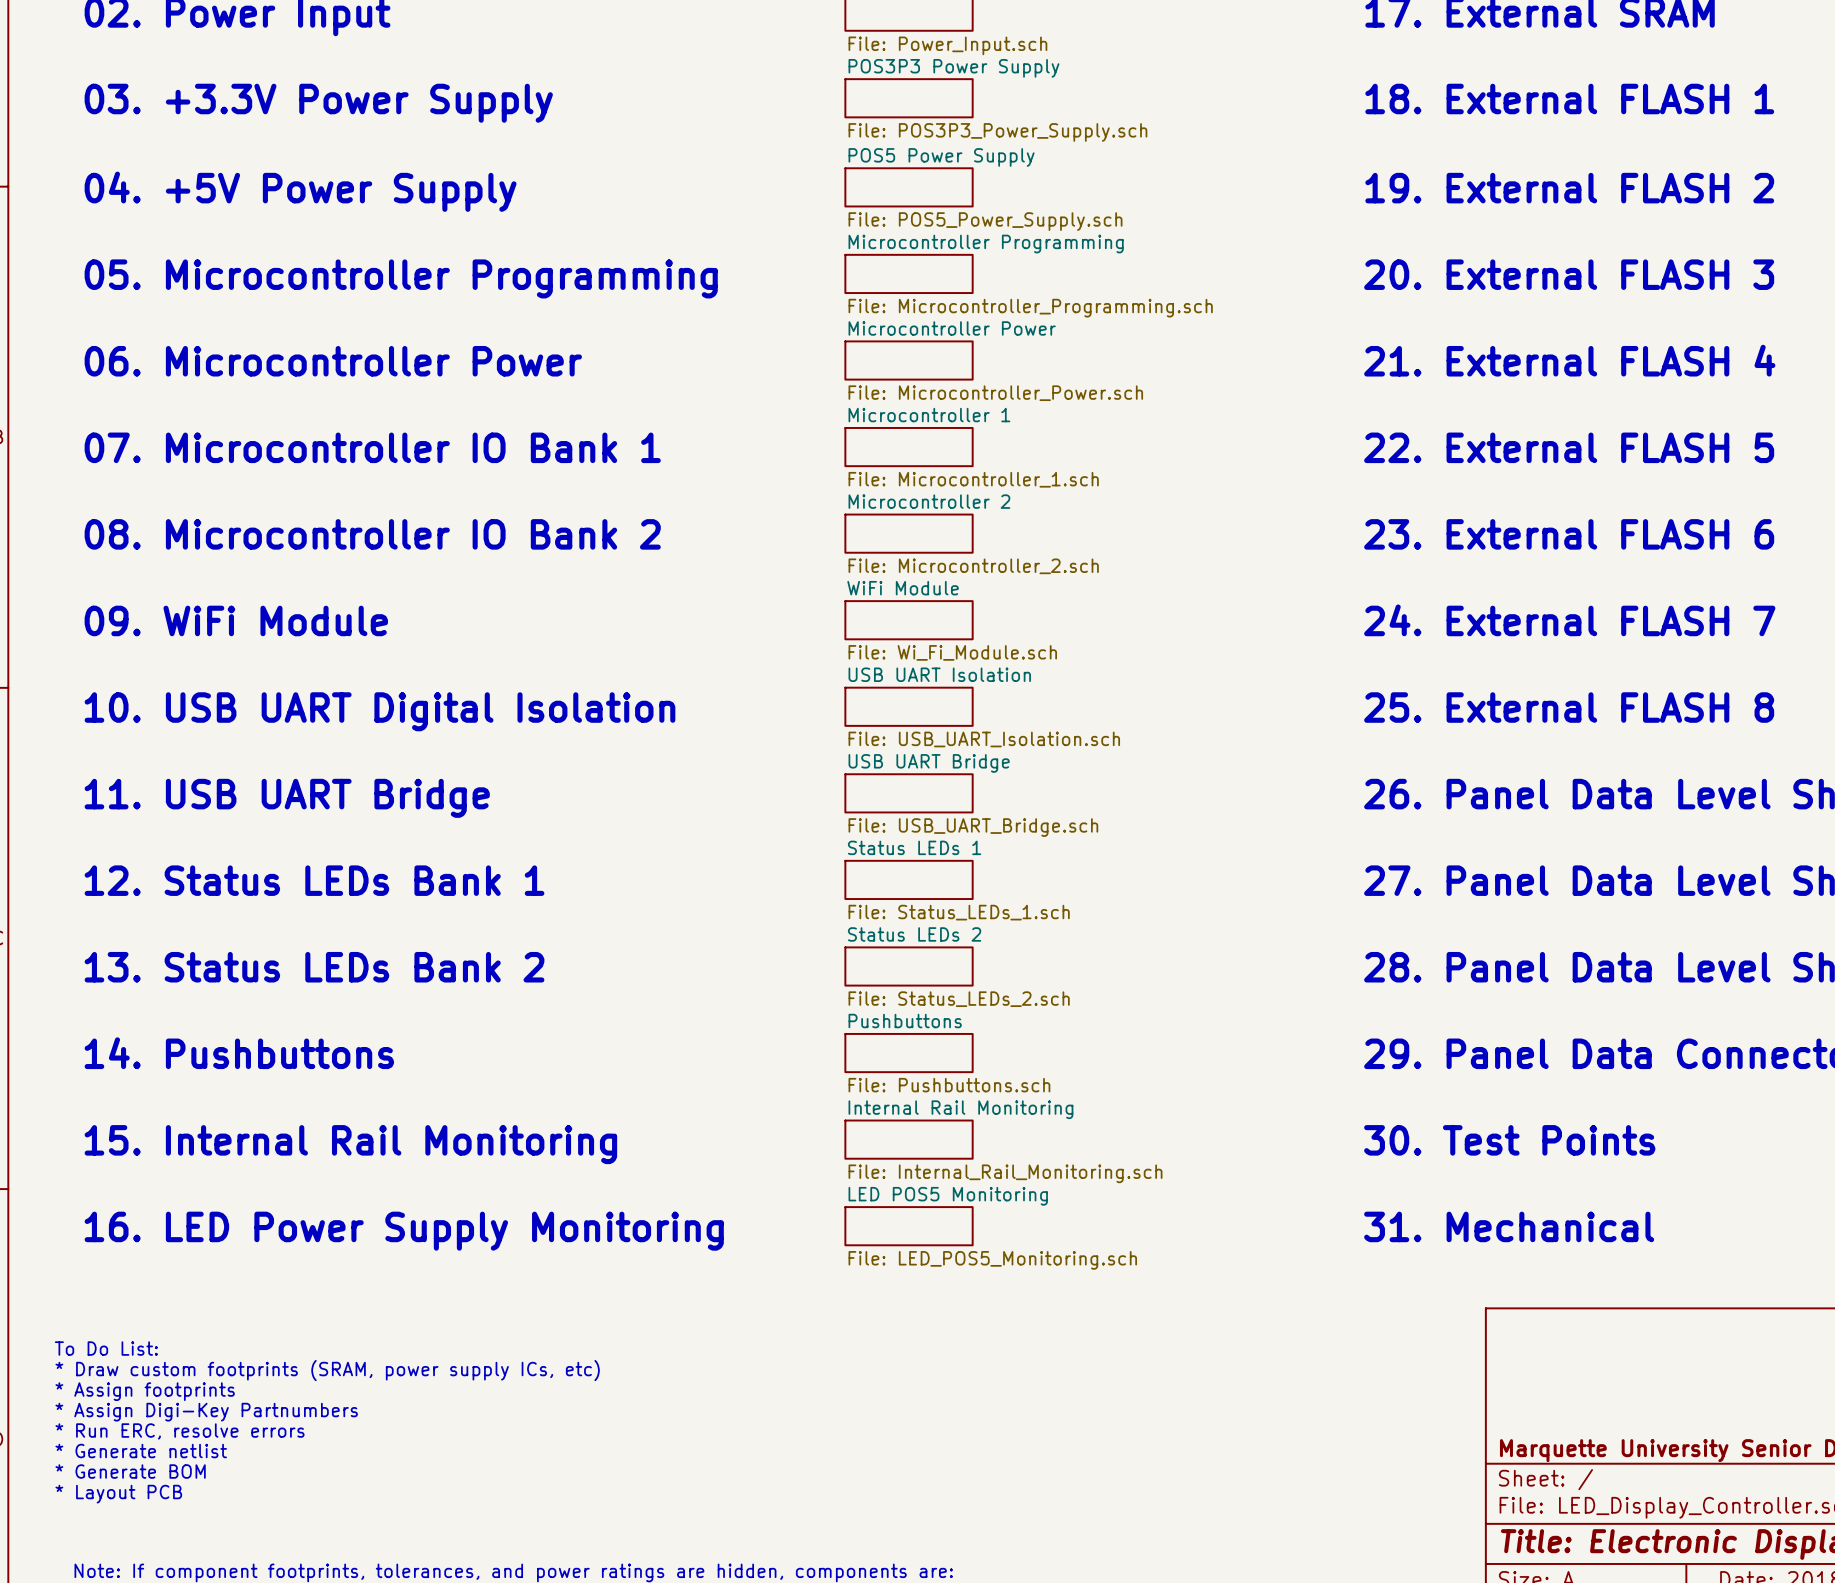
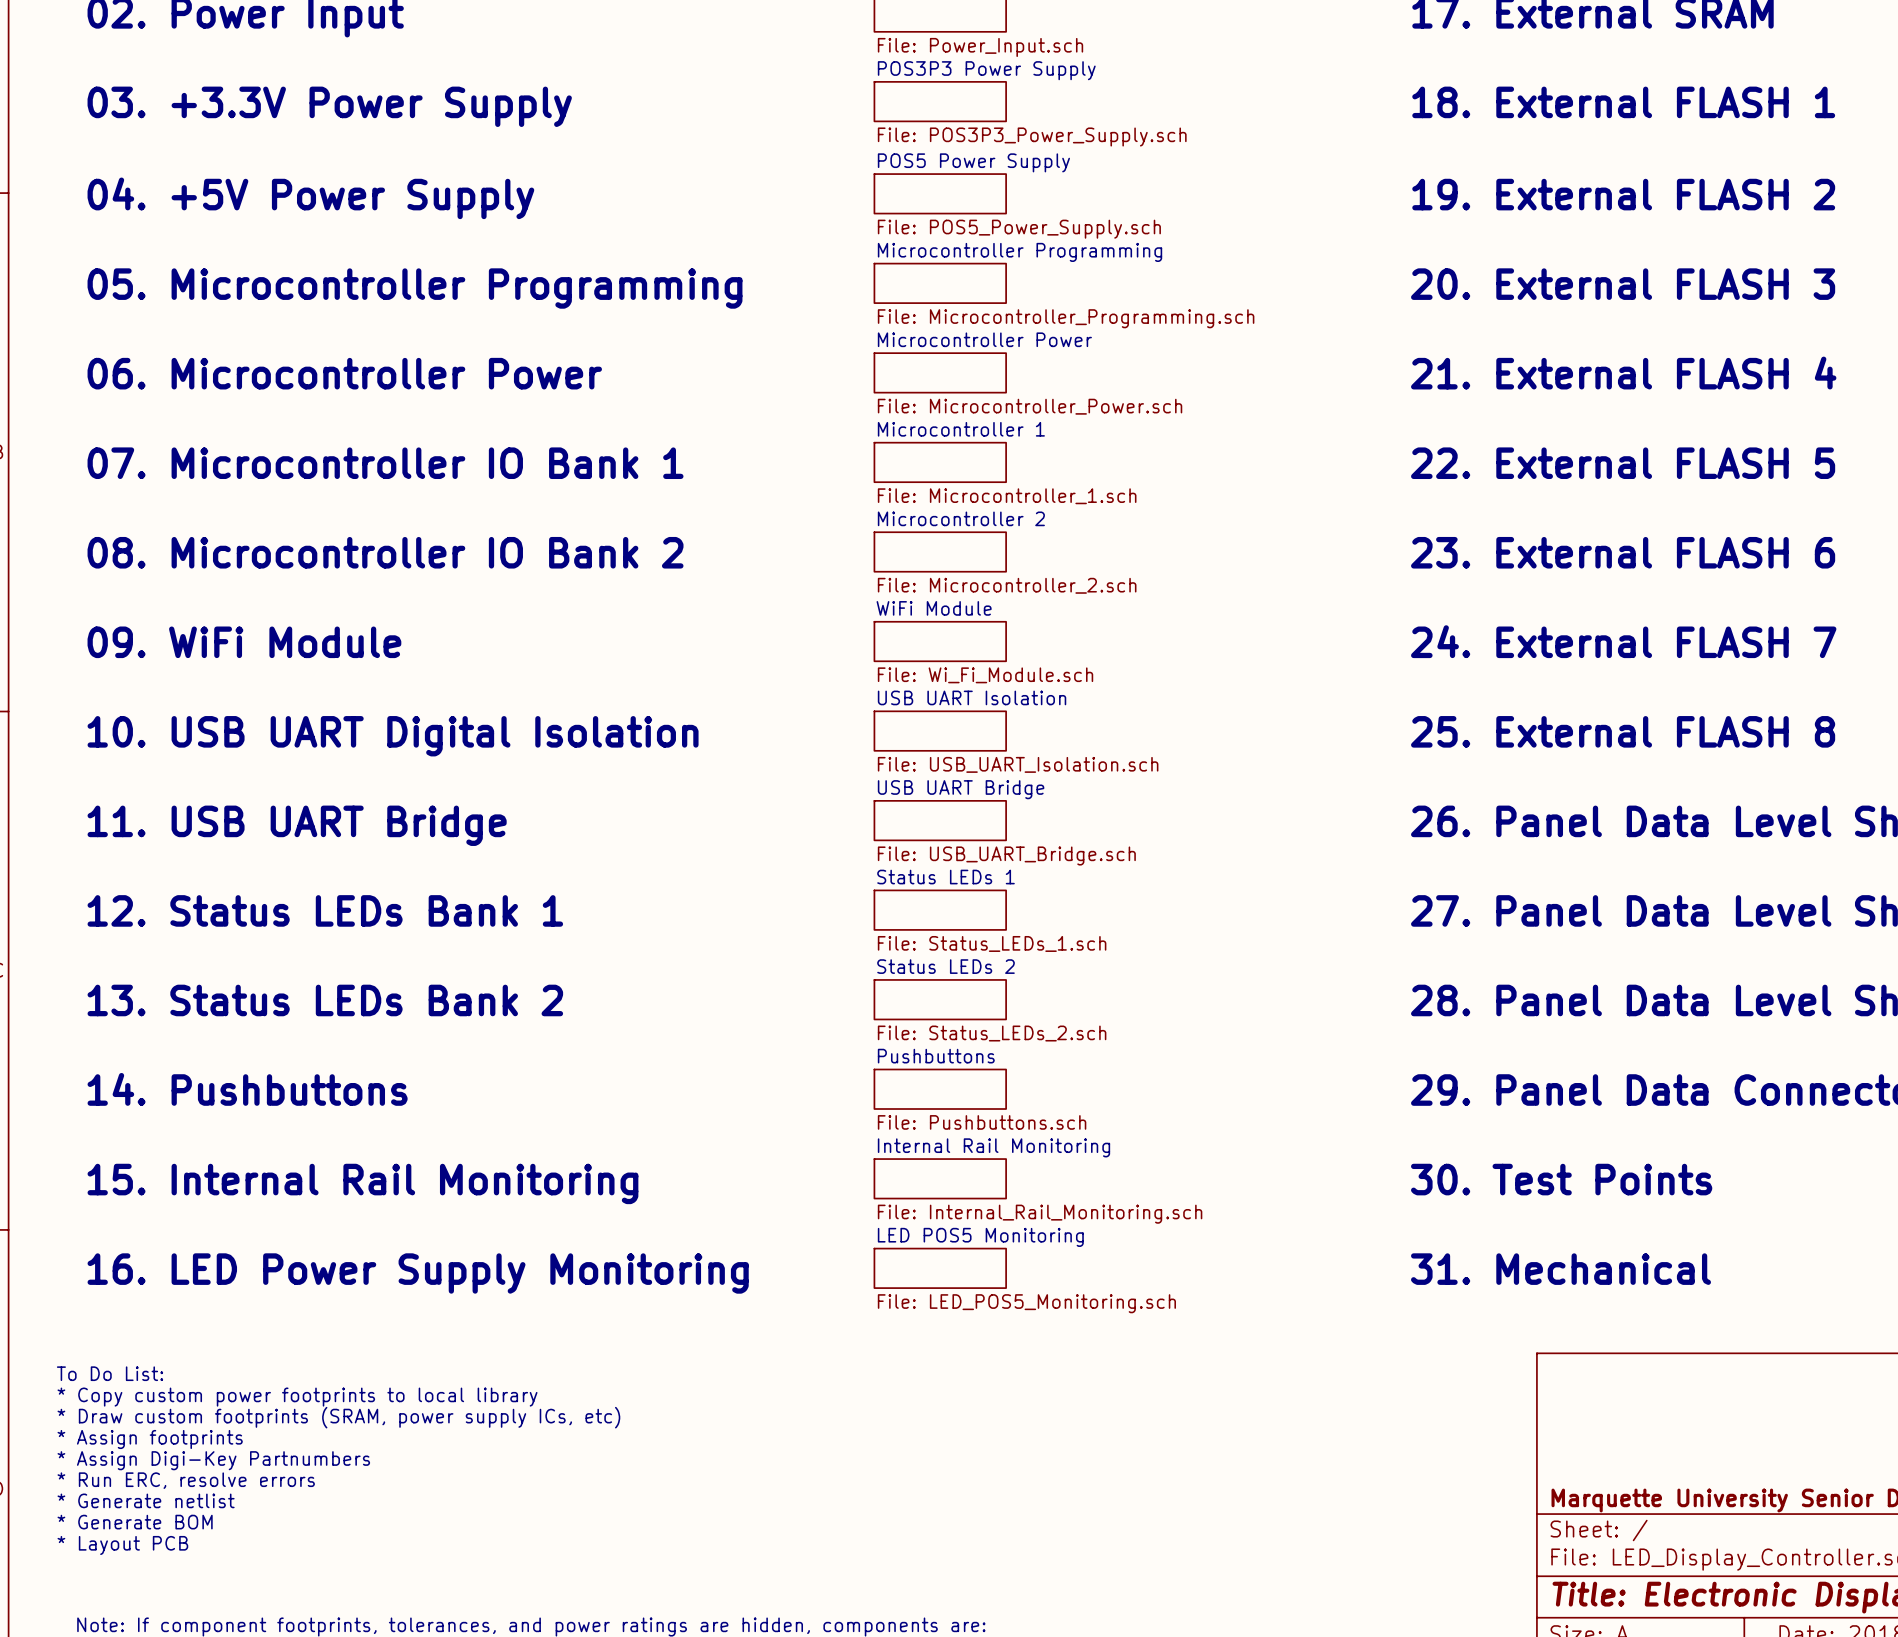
text: none -> To Do List: (110, 1373)
text: To Do List: (106, 1348) -> * Copy custom power footprints to local library (297, 1397)

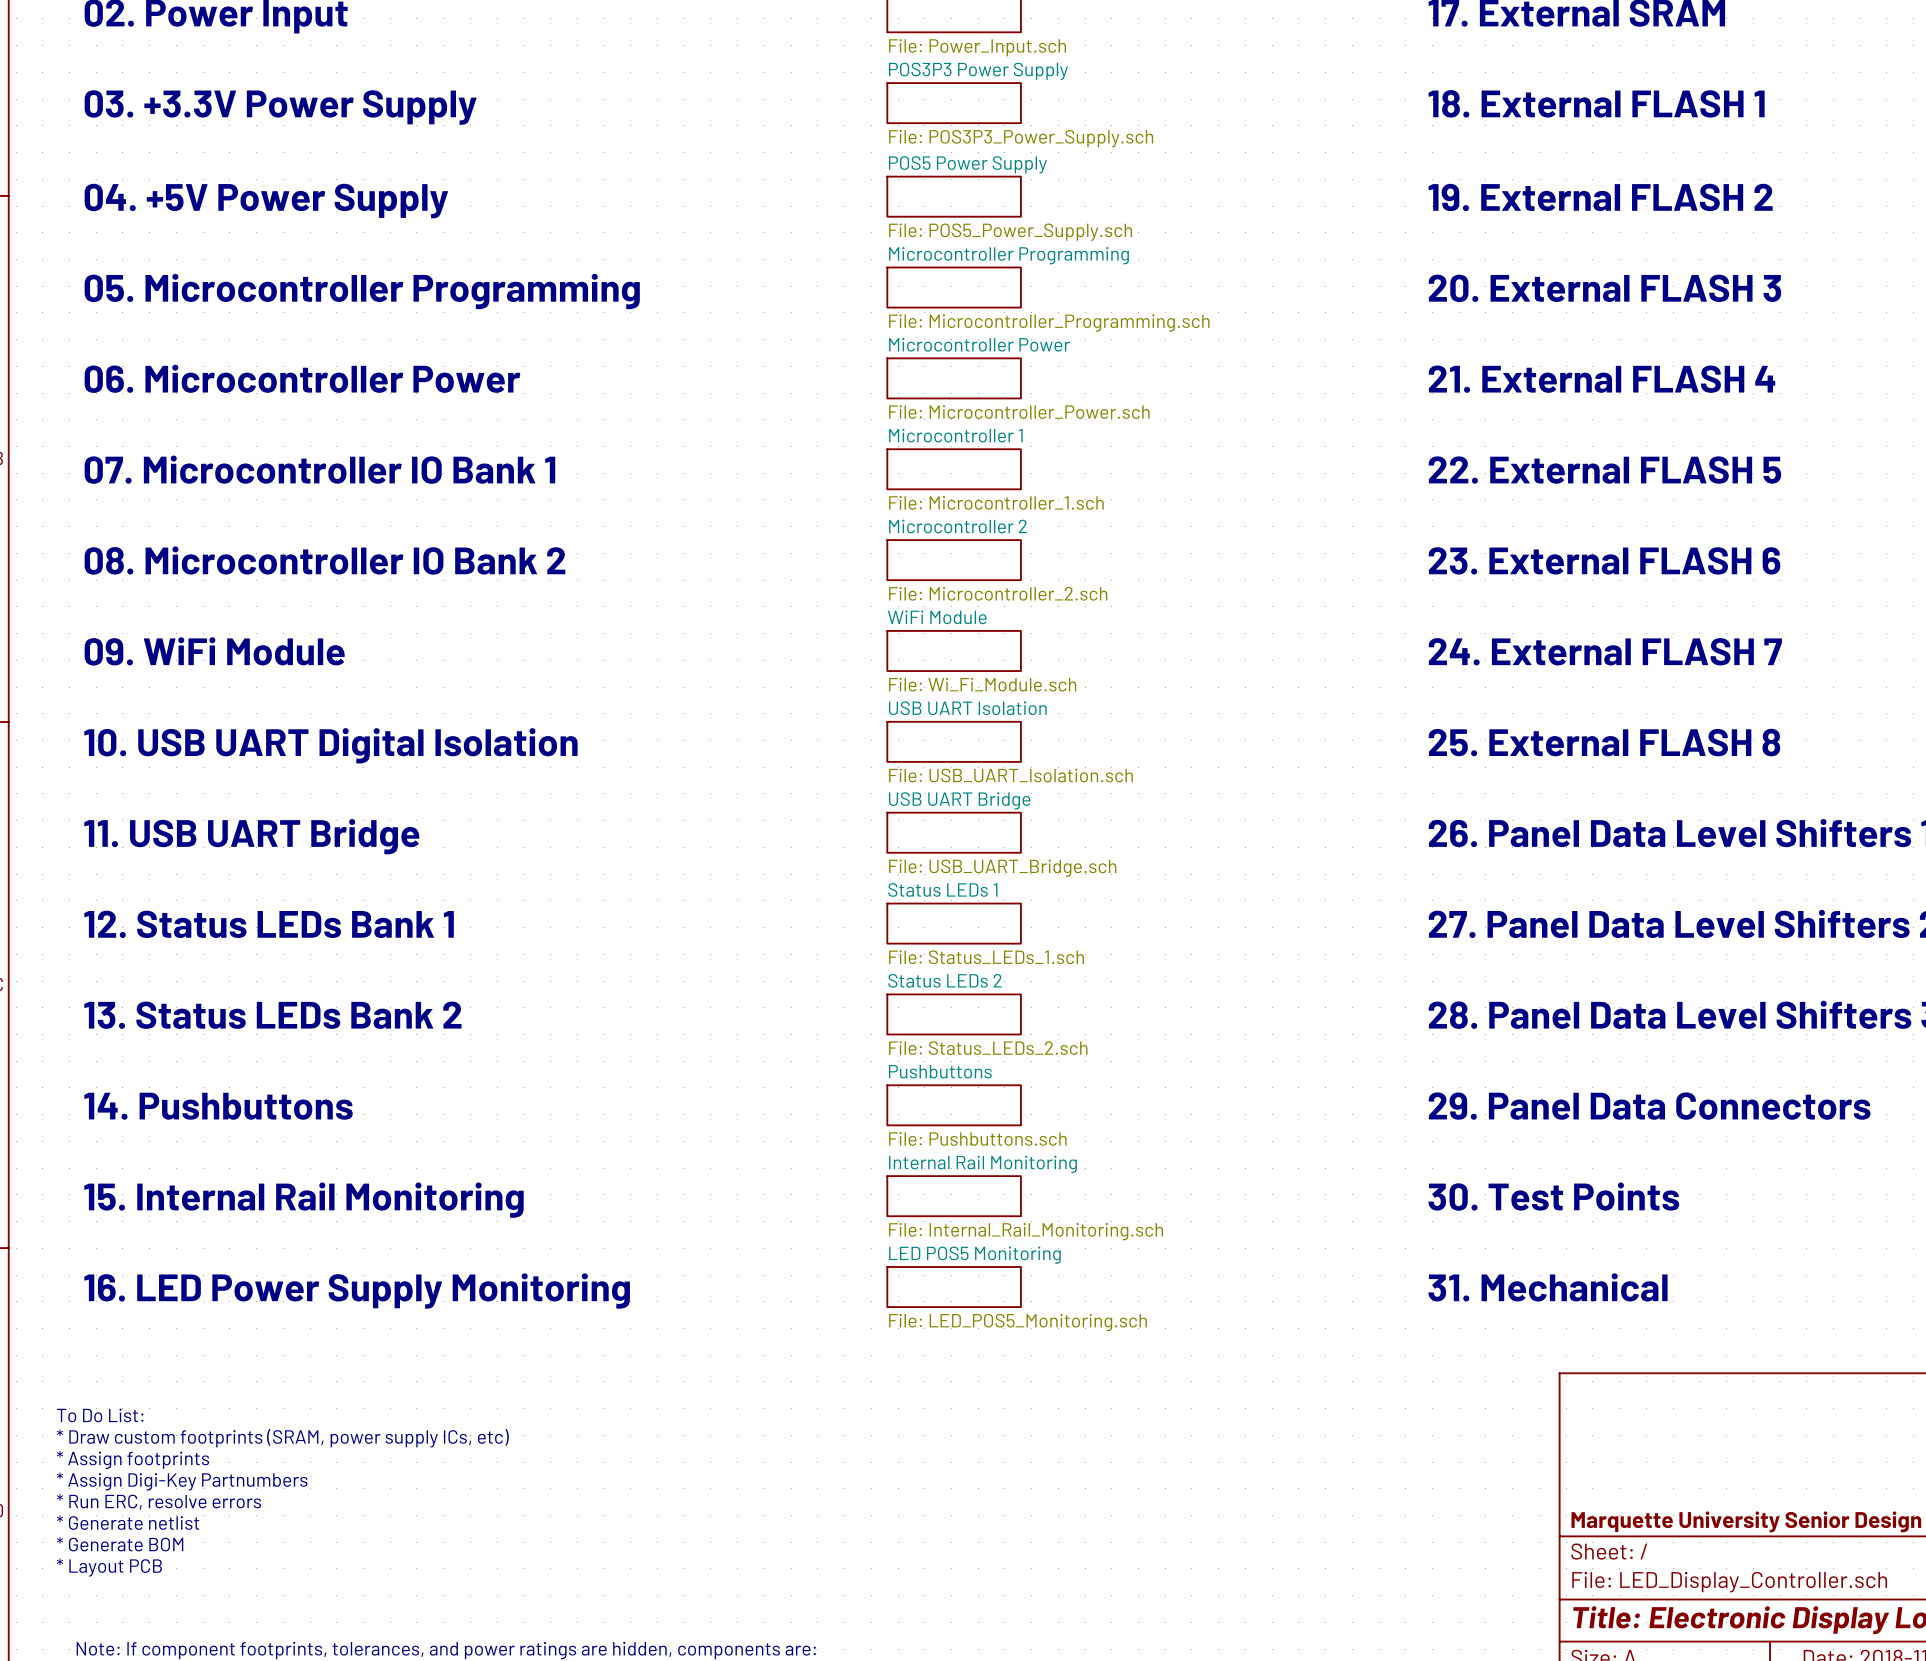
text: To Do List: (110, 1373) -> none
text: * Copy custom power footprints to local library (297, 1397) -> To Do List: (100, 1415)

